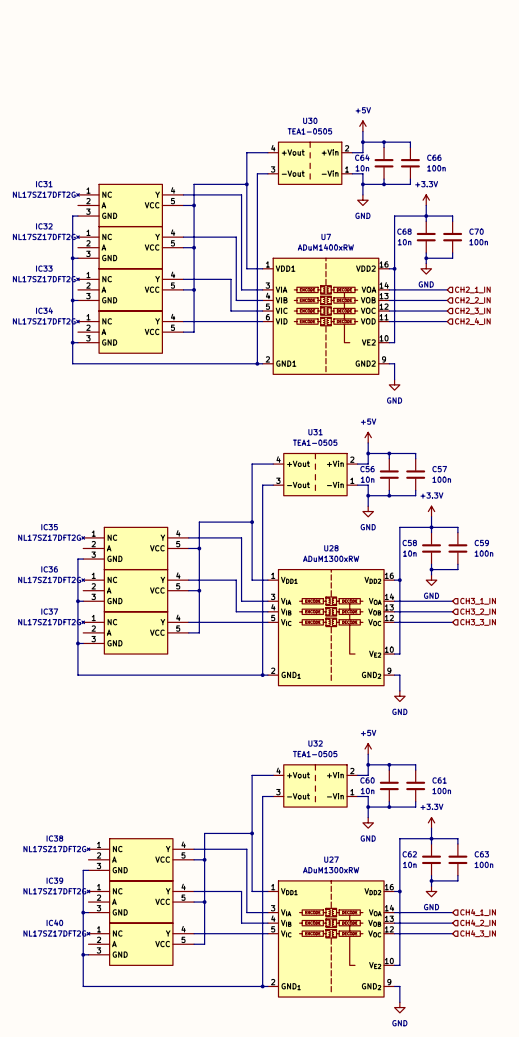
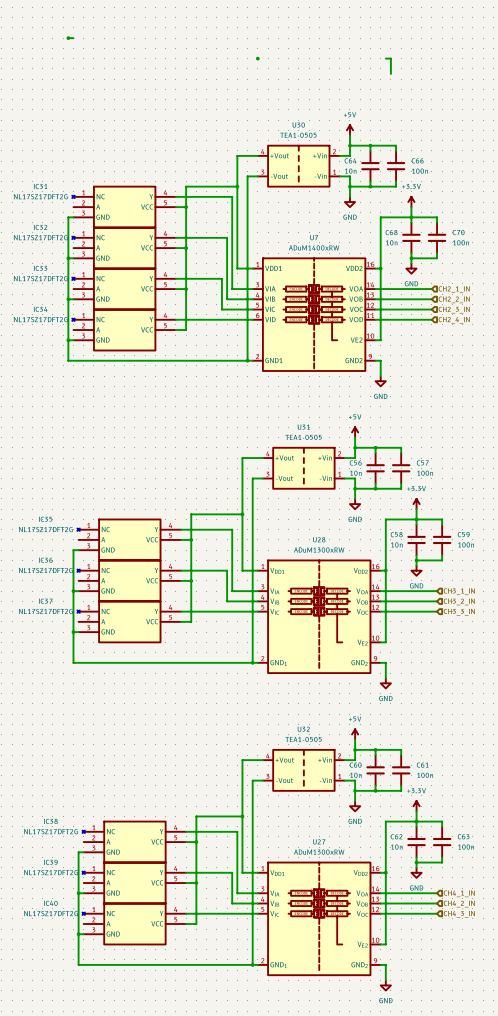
wire: none -> (68, 38) (73, 38)
junction: none -> (68, 38)
junction: none -> (257, 58)
wire: none -> (385, 58) (390, 58) (390, 73)

